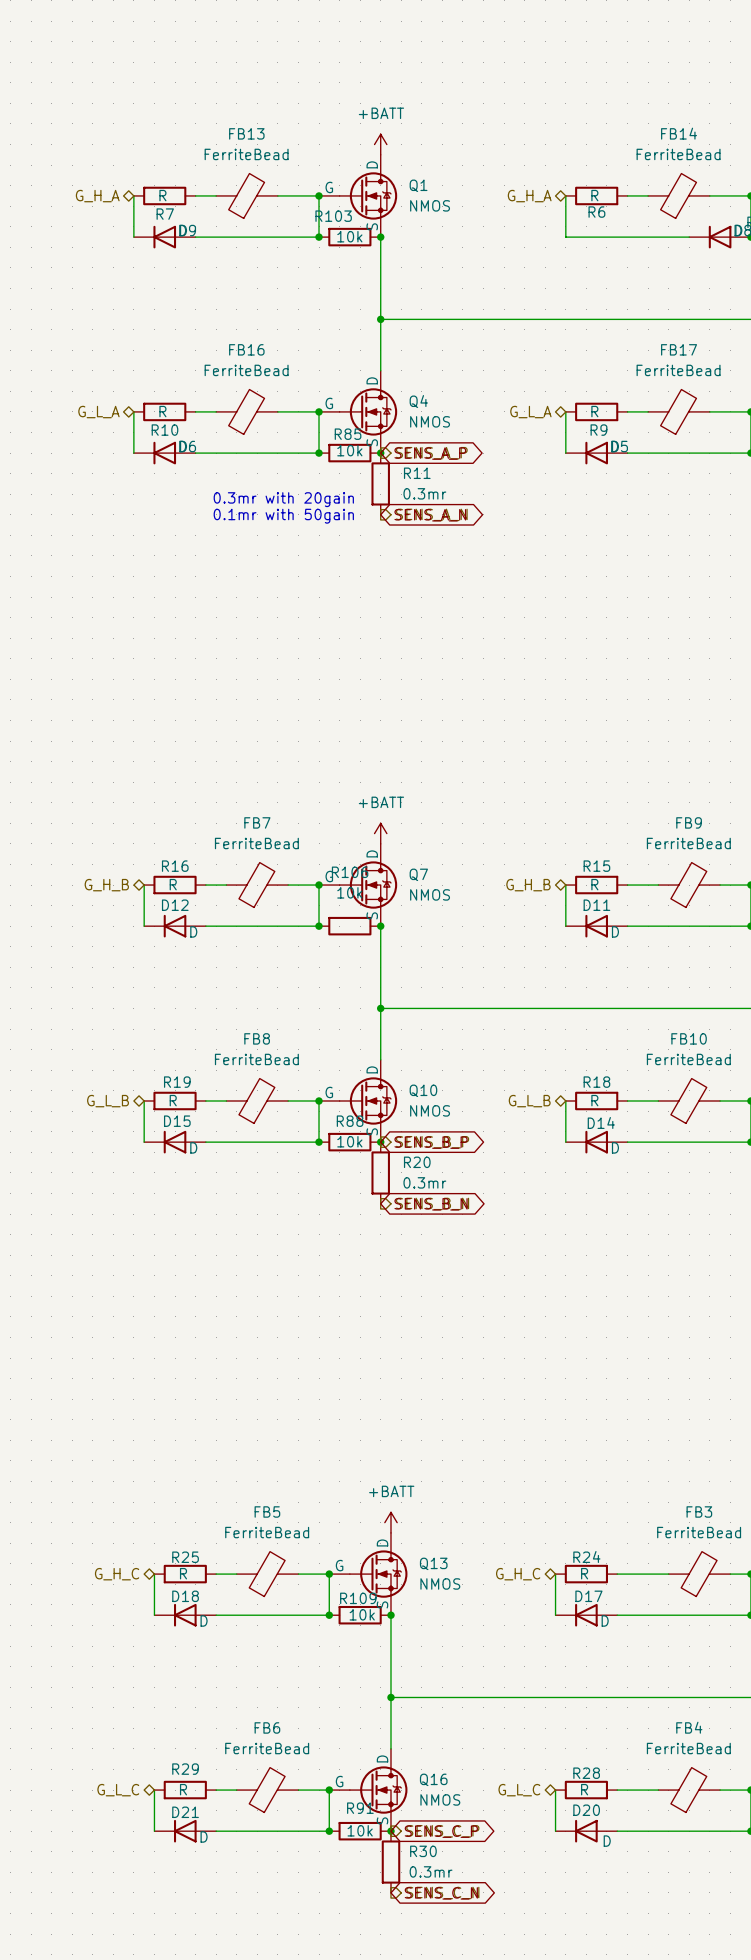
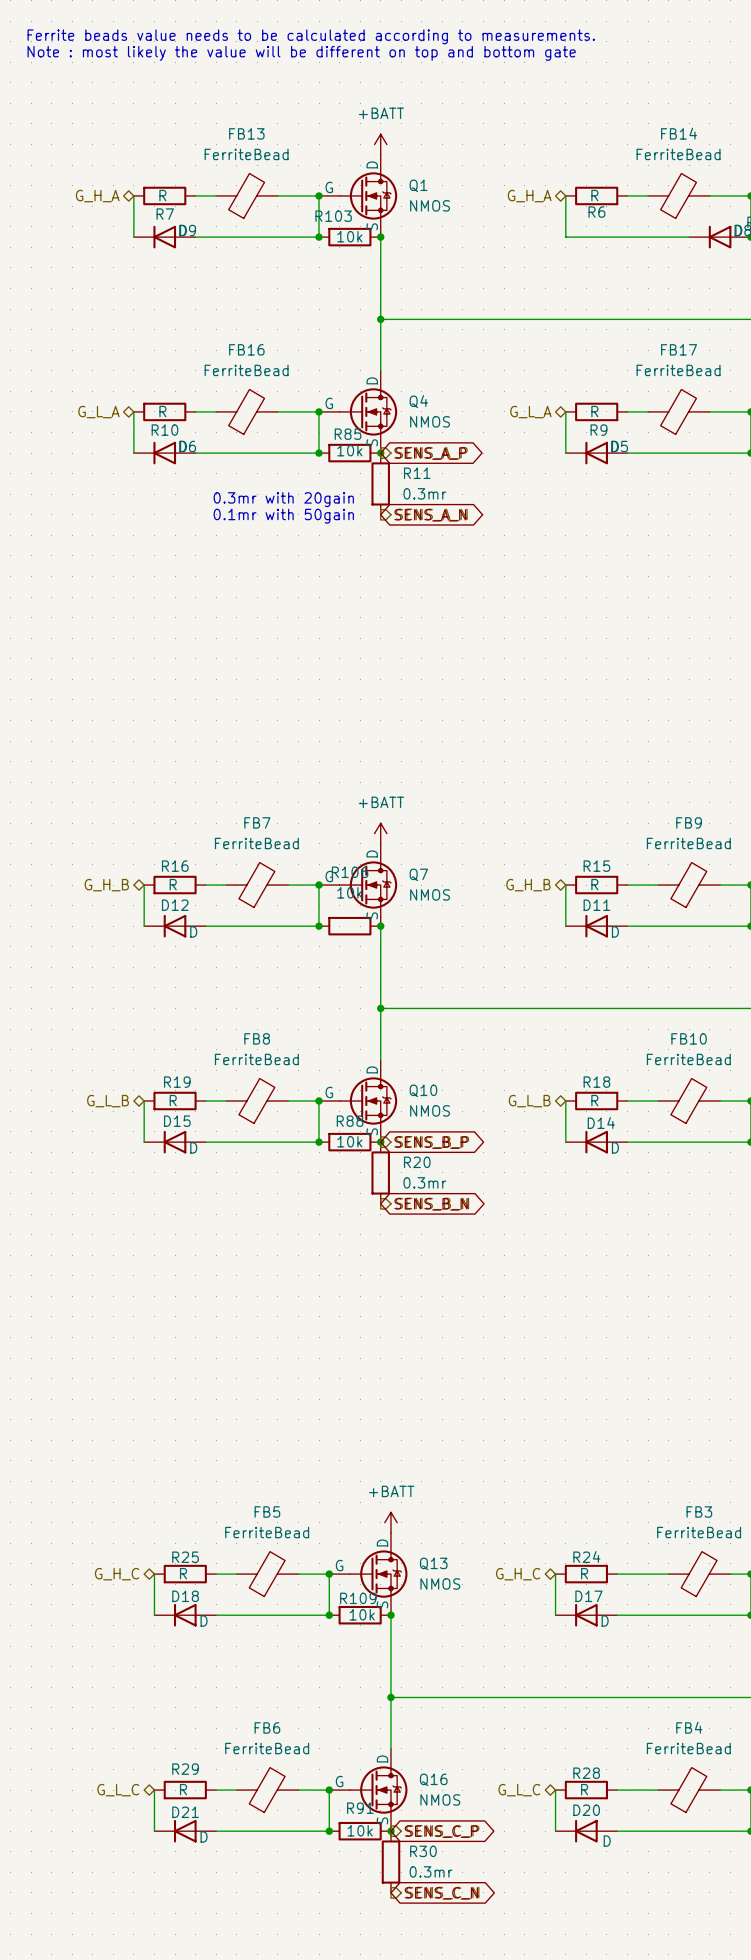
text: none -> Ferrite beads value needs to be calculated according to measurements. (311, 36)
text: none -> Note : most likely the value will be different on top and bottom gate (301, 53)

